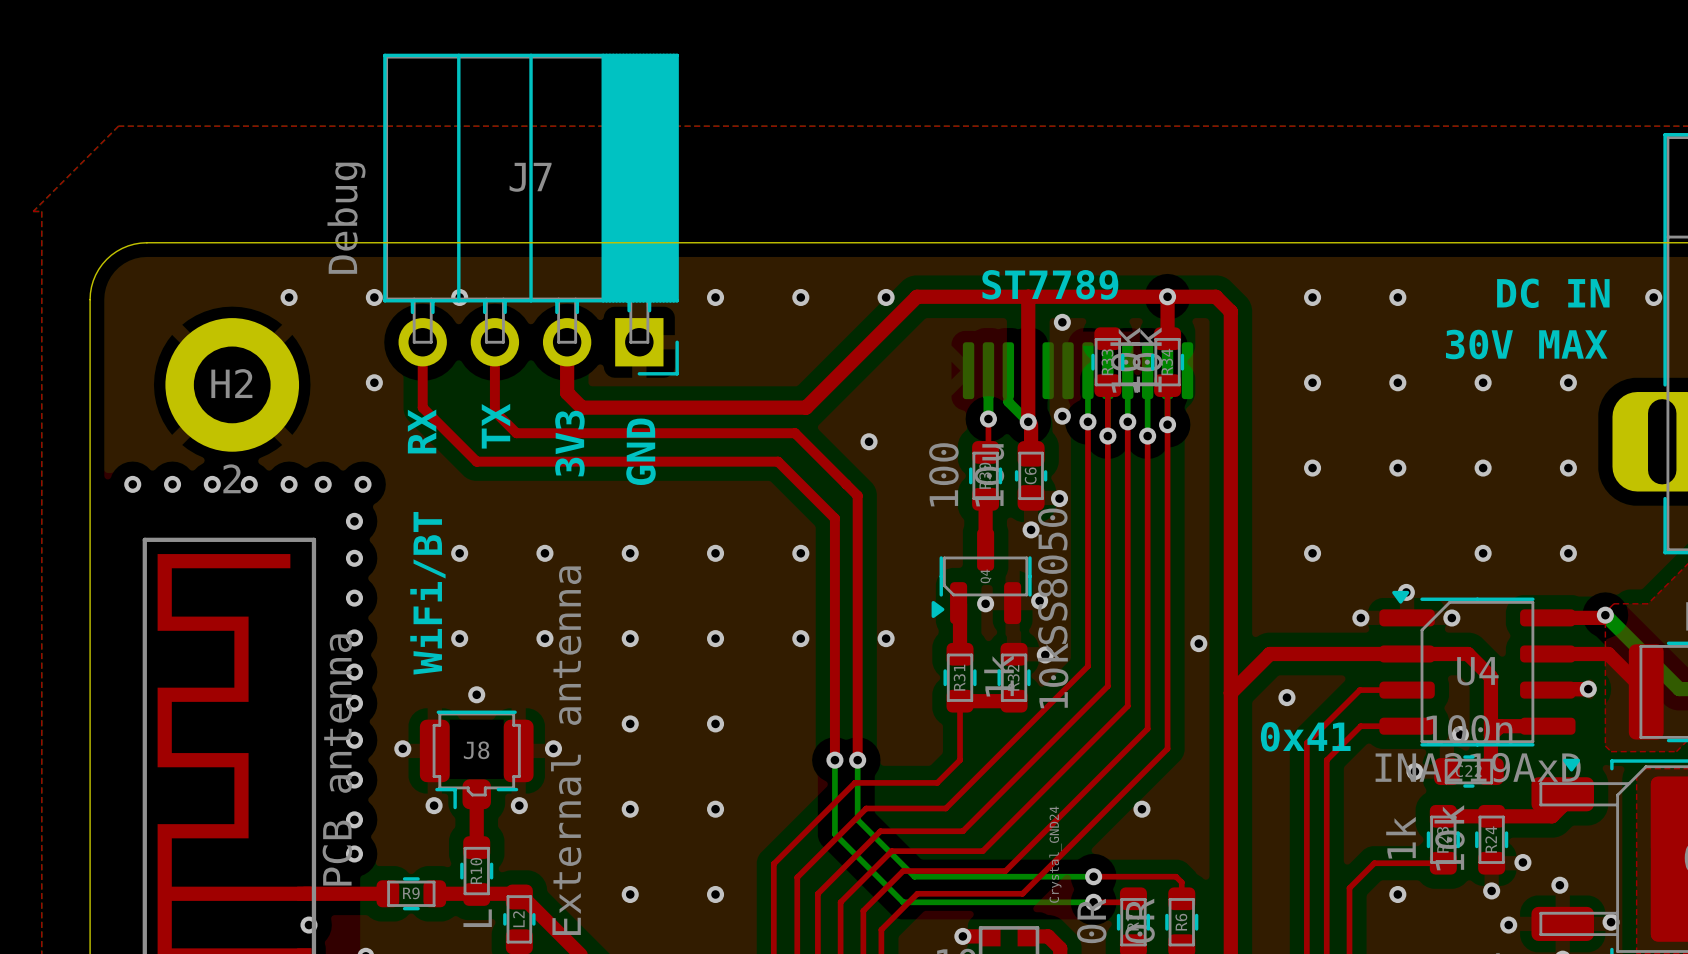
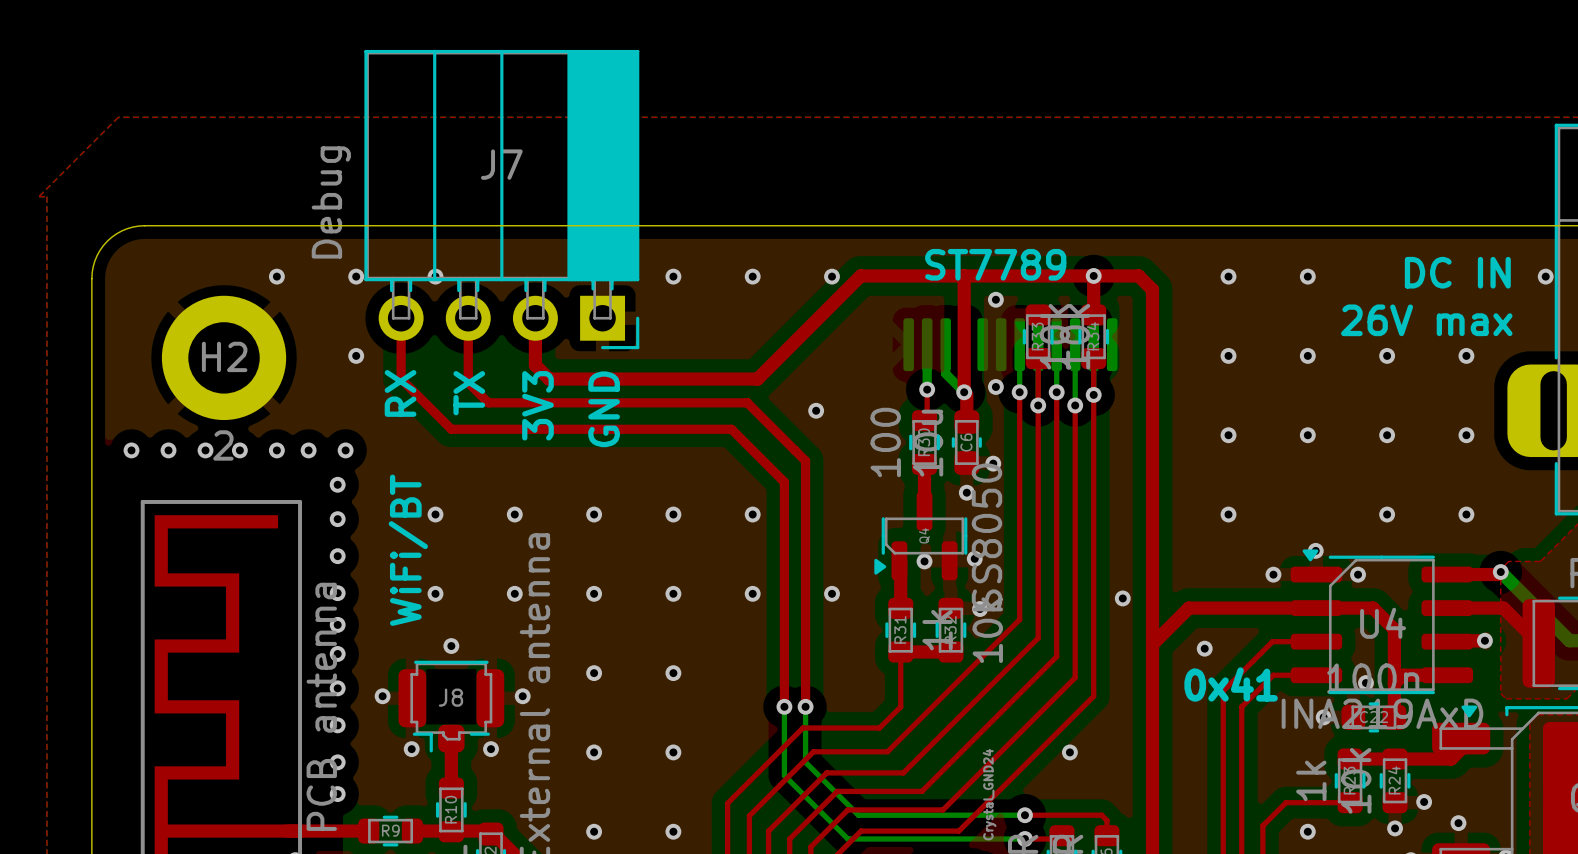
text: 30V MAX (1526, 344) -> 26V max (1426, 320)

